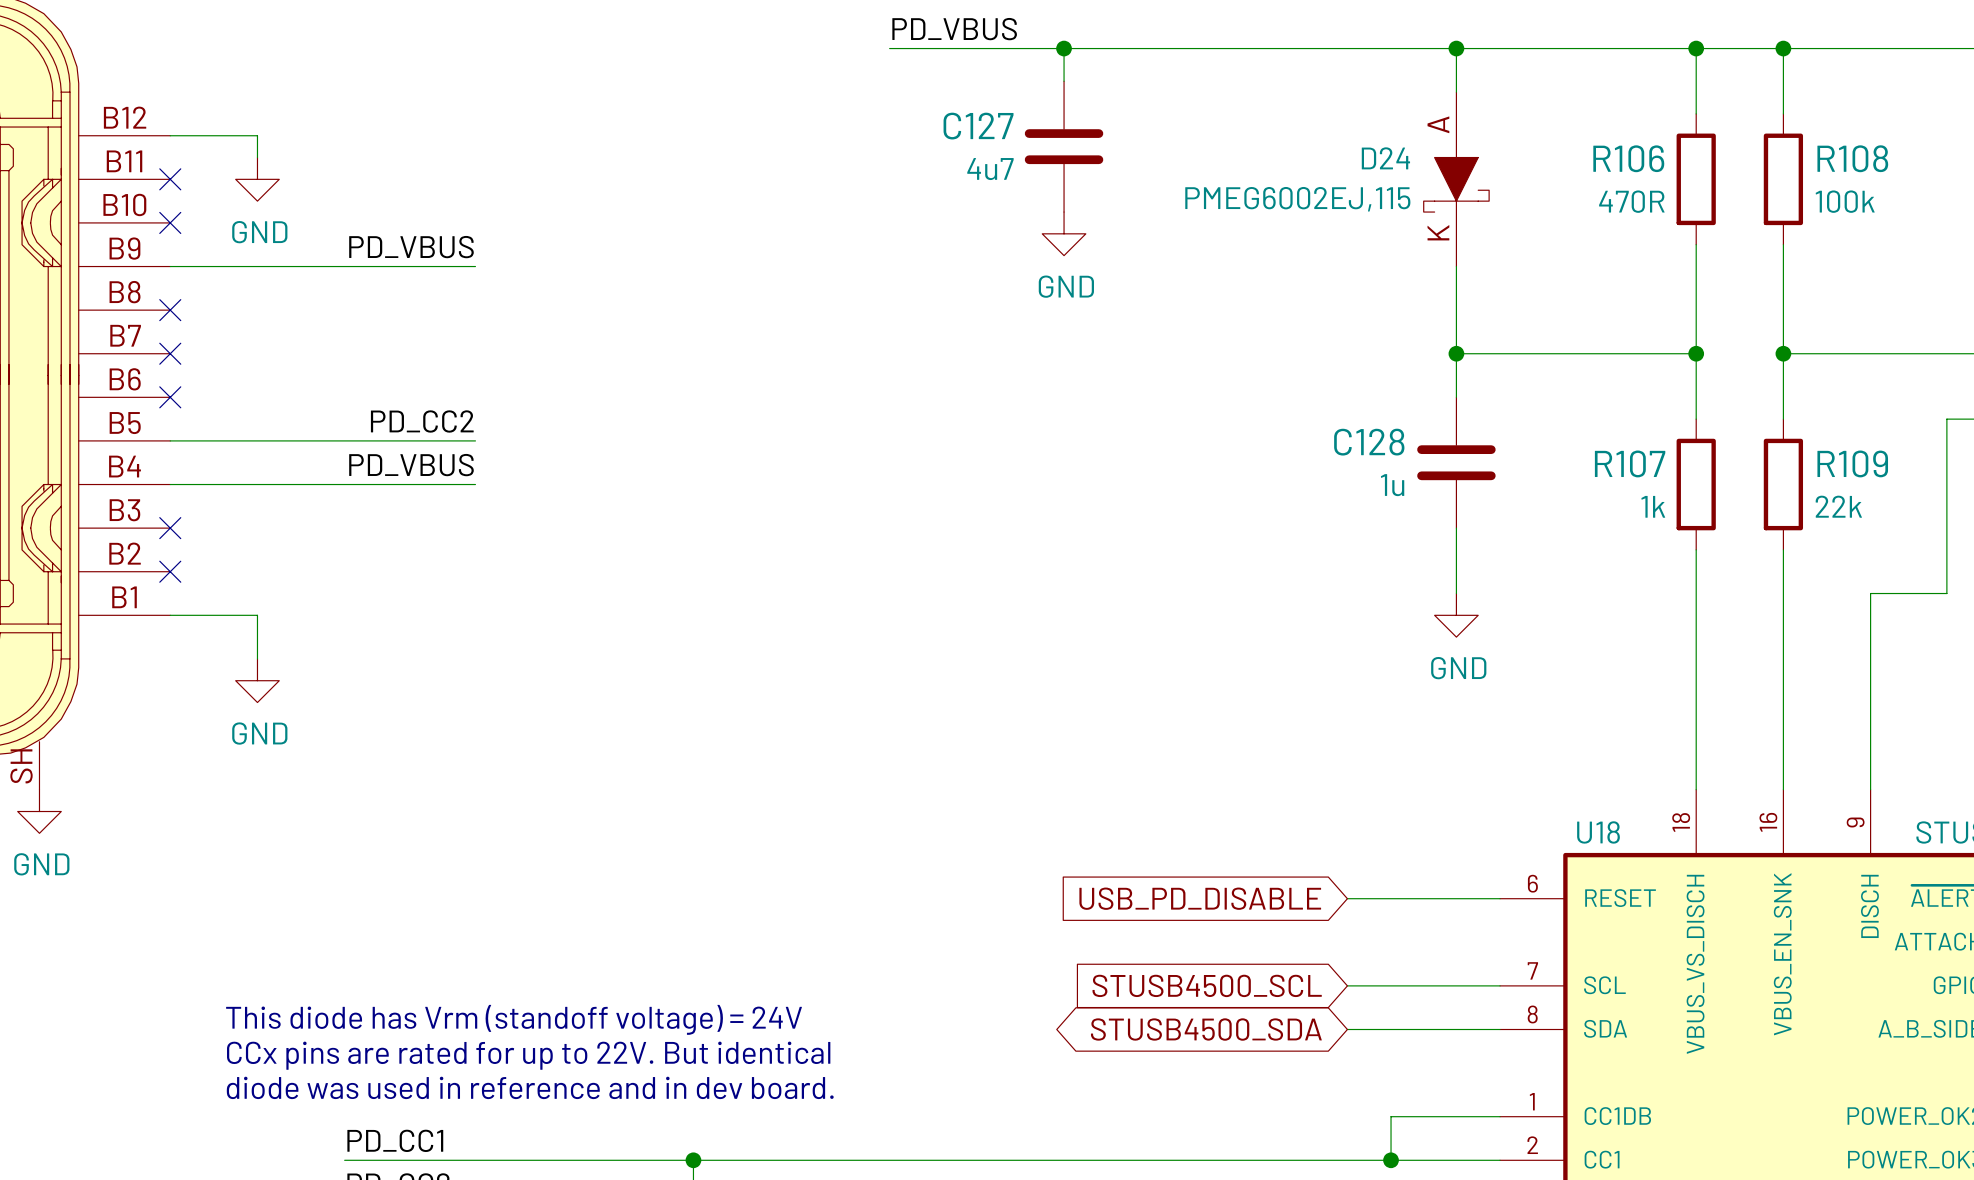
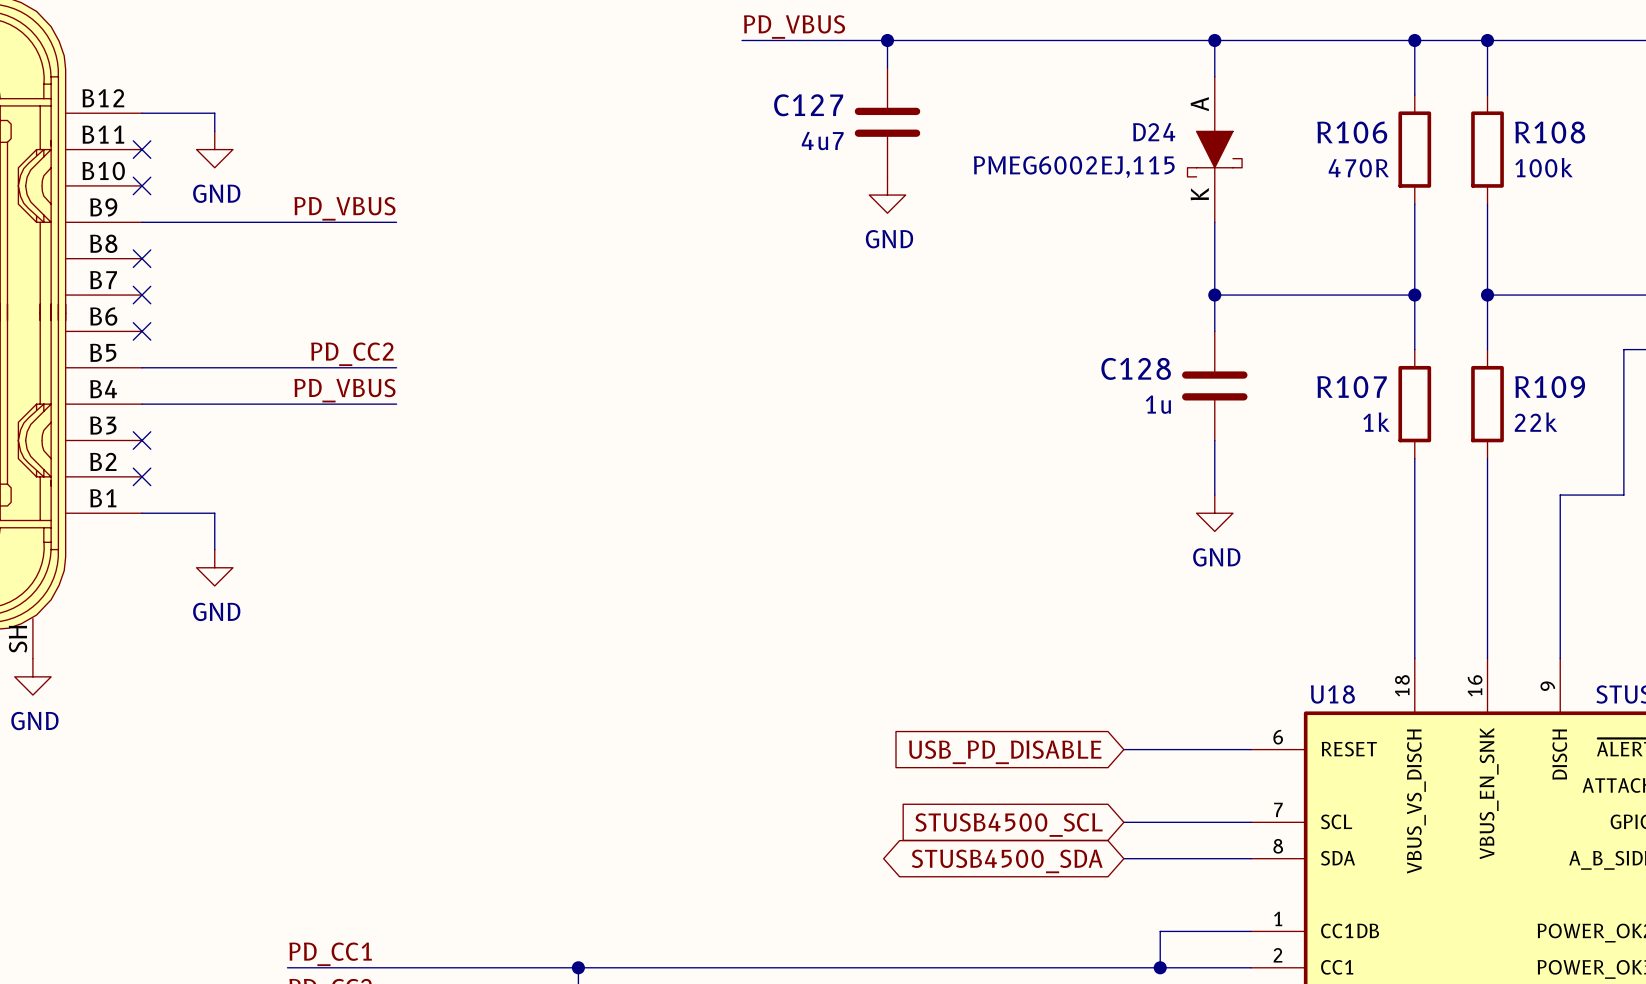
text: This diode has Vrm (standoff voltage) = 24V (514, 1019) -> none
text: CCx pins are rated for up to 22V. But identical (528, 1055) -> none
text: diode was used in reference and in dev board. (530, 1087) -> none

